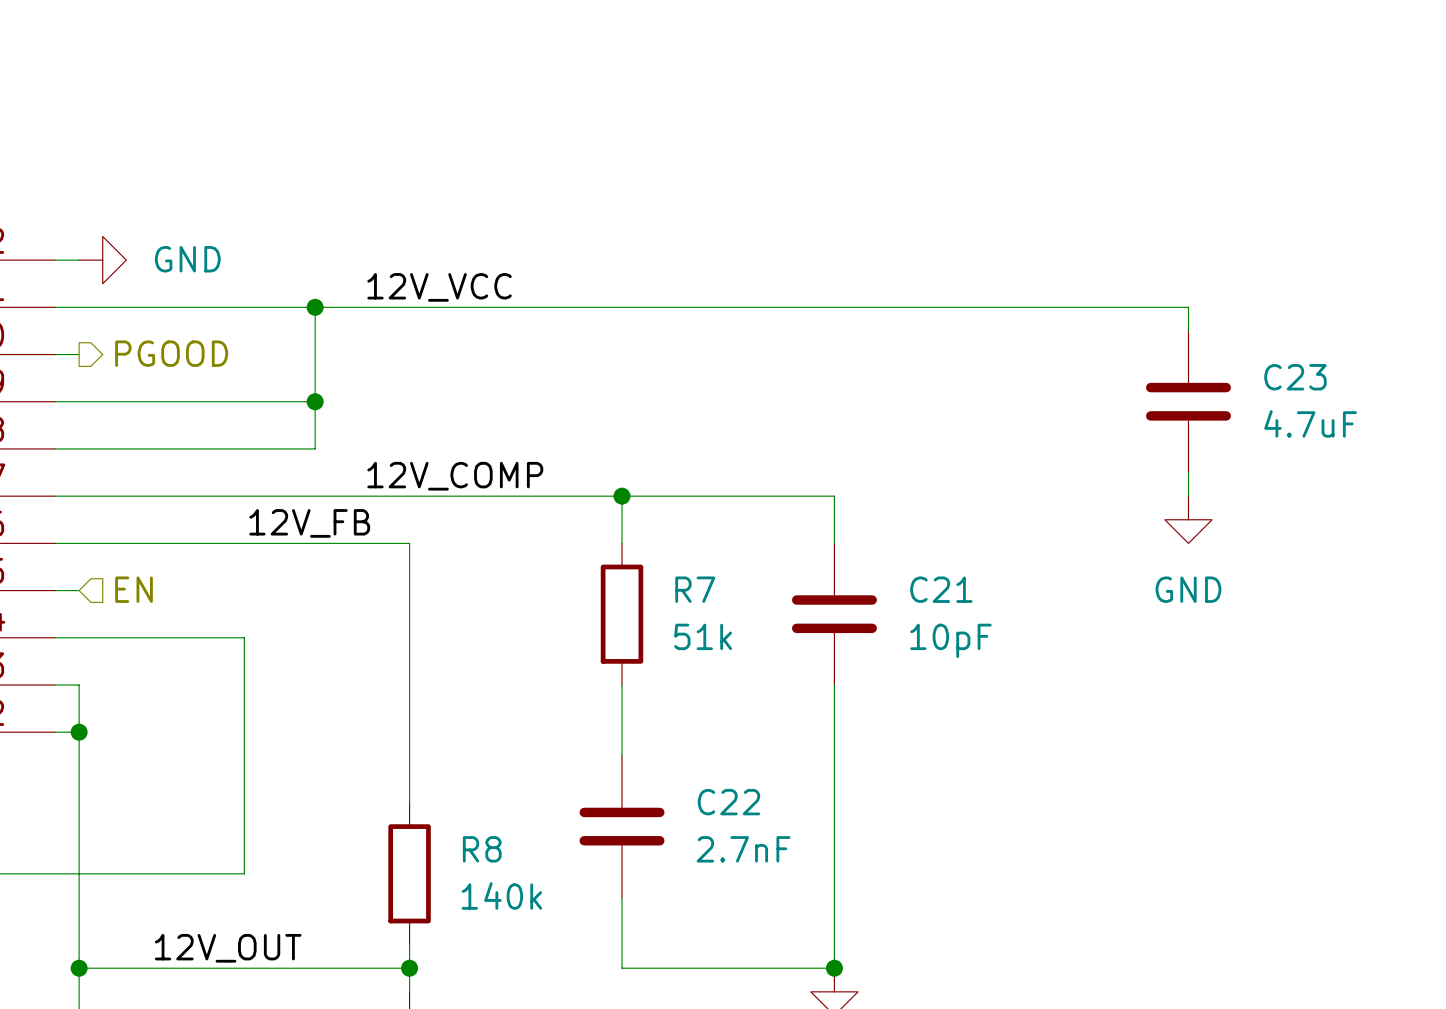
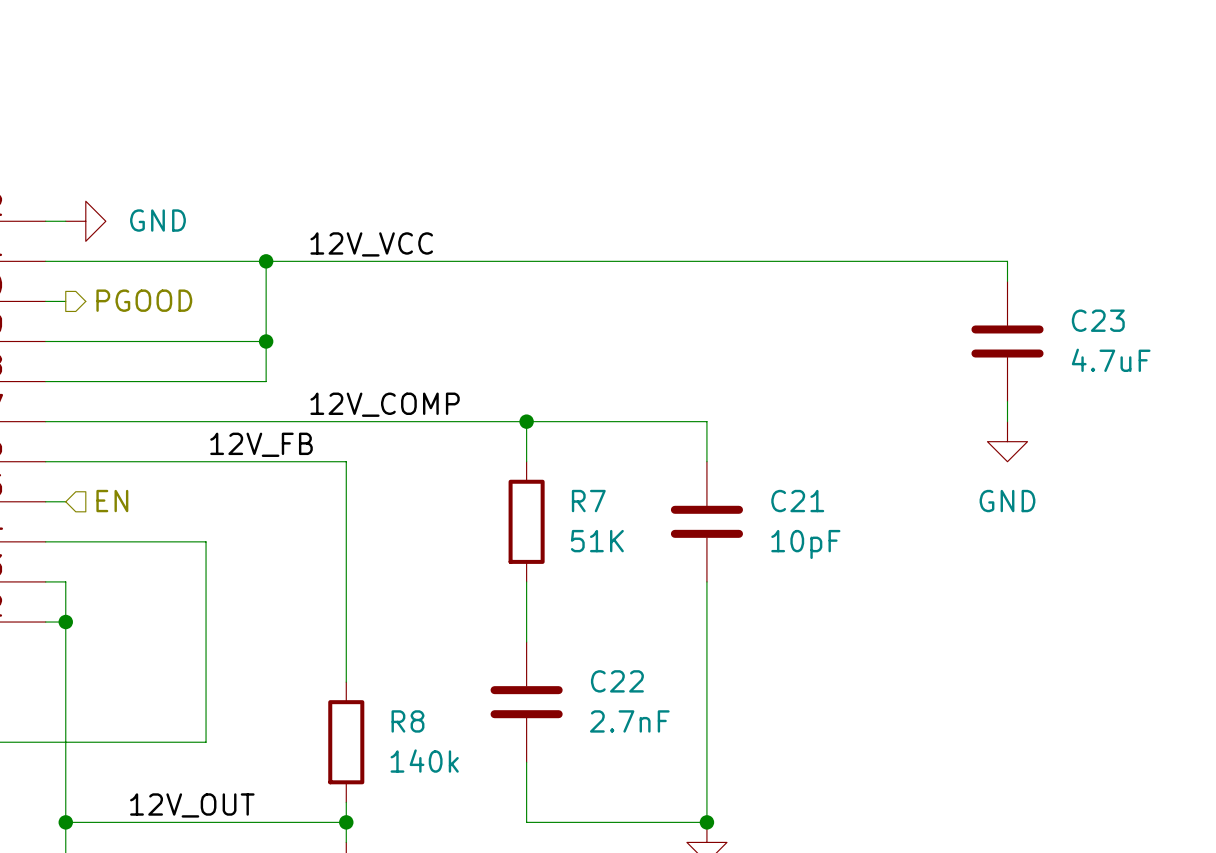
R7 value: 51k (703, 636) -> 51K (597, 541)

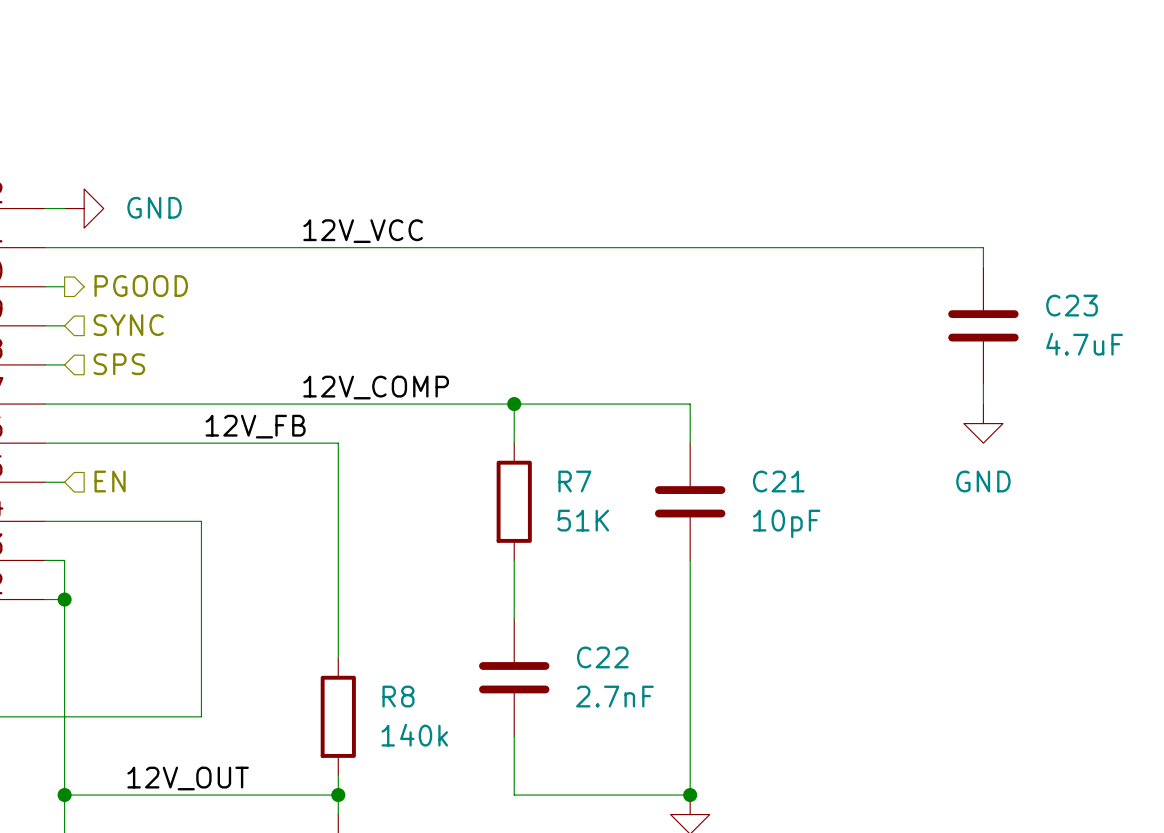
wire: (266, 261) (266, 381) (65, 381) -> none
junction: (266, 261) -> none
hierarchical label: none -> SYNC (128, 325)
wire: (65, 341) (266, 341) -> none
junction: (266, 341) -> none
hierarchical label: none -> SPS (119, 364)

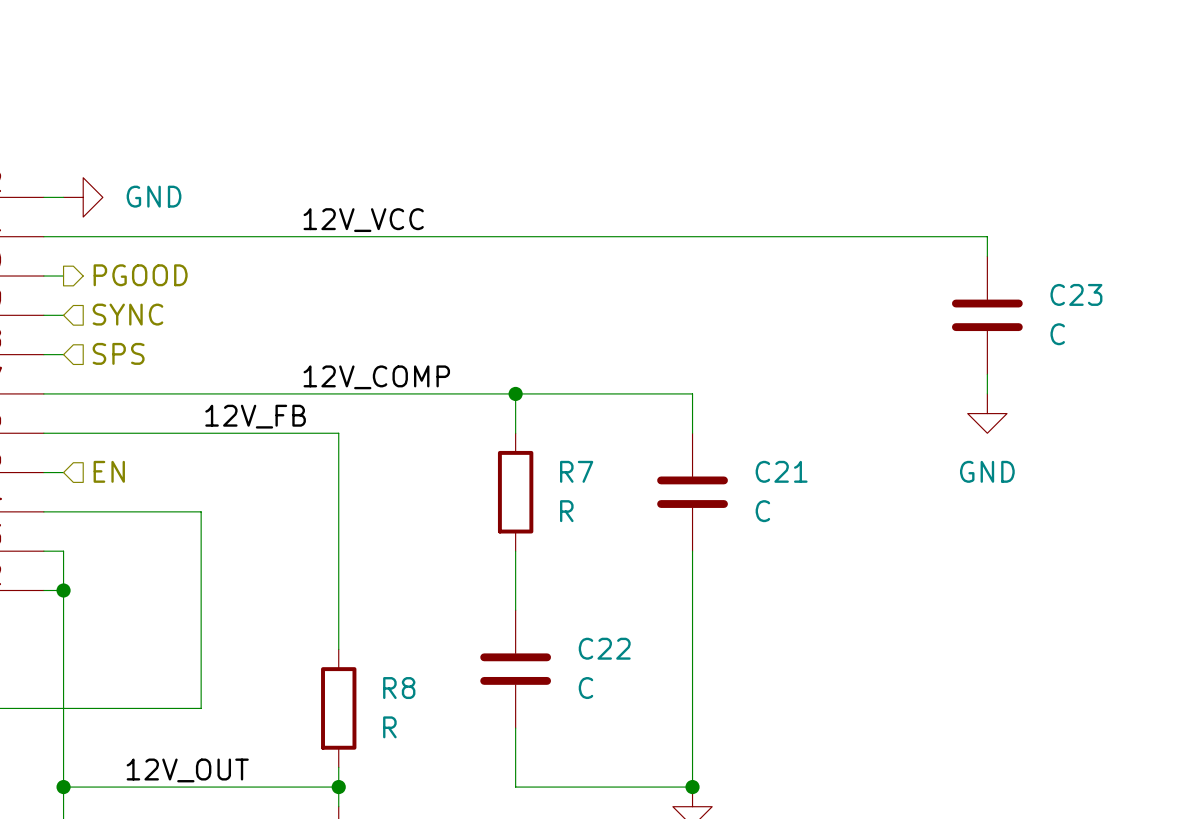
C23 value: 4.7uF (1084, 344) -> C (1057, 334)
R7 value: 51K (583, 520) -> R (566, 511)
C21 value: 10pF (786, 523) -> C (762, 511)
C22 value: 2.7nF (614, 696) -> C (585, 688)
R8 value: 140k (414, 735) -> R (389, 727)

